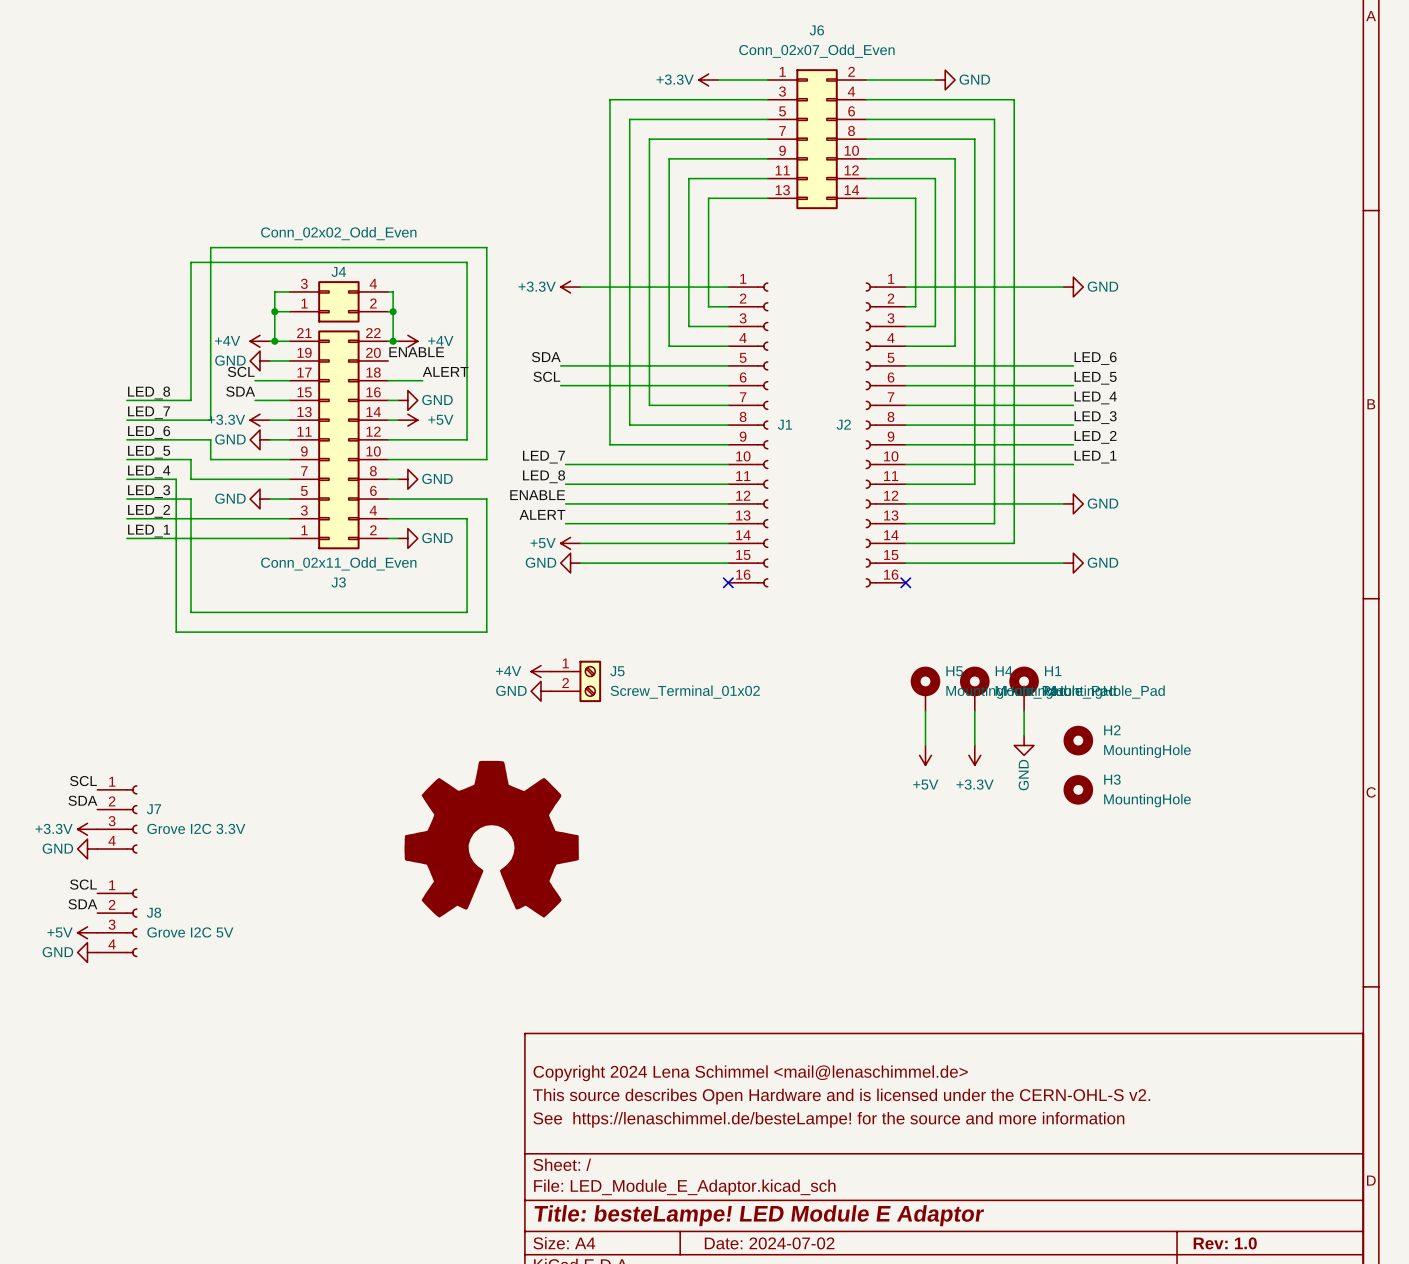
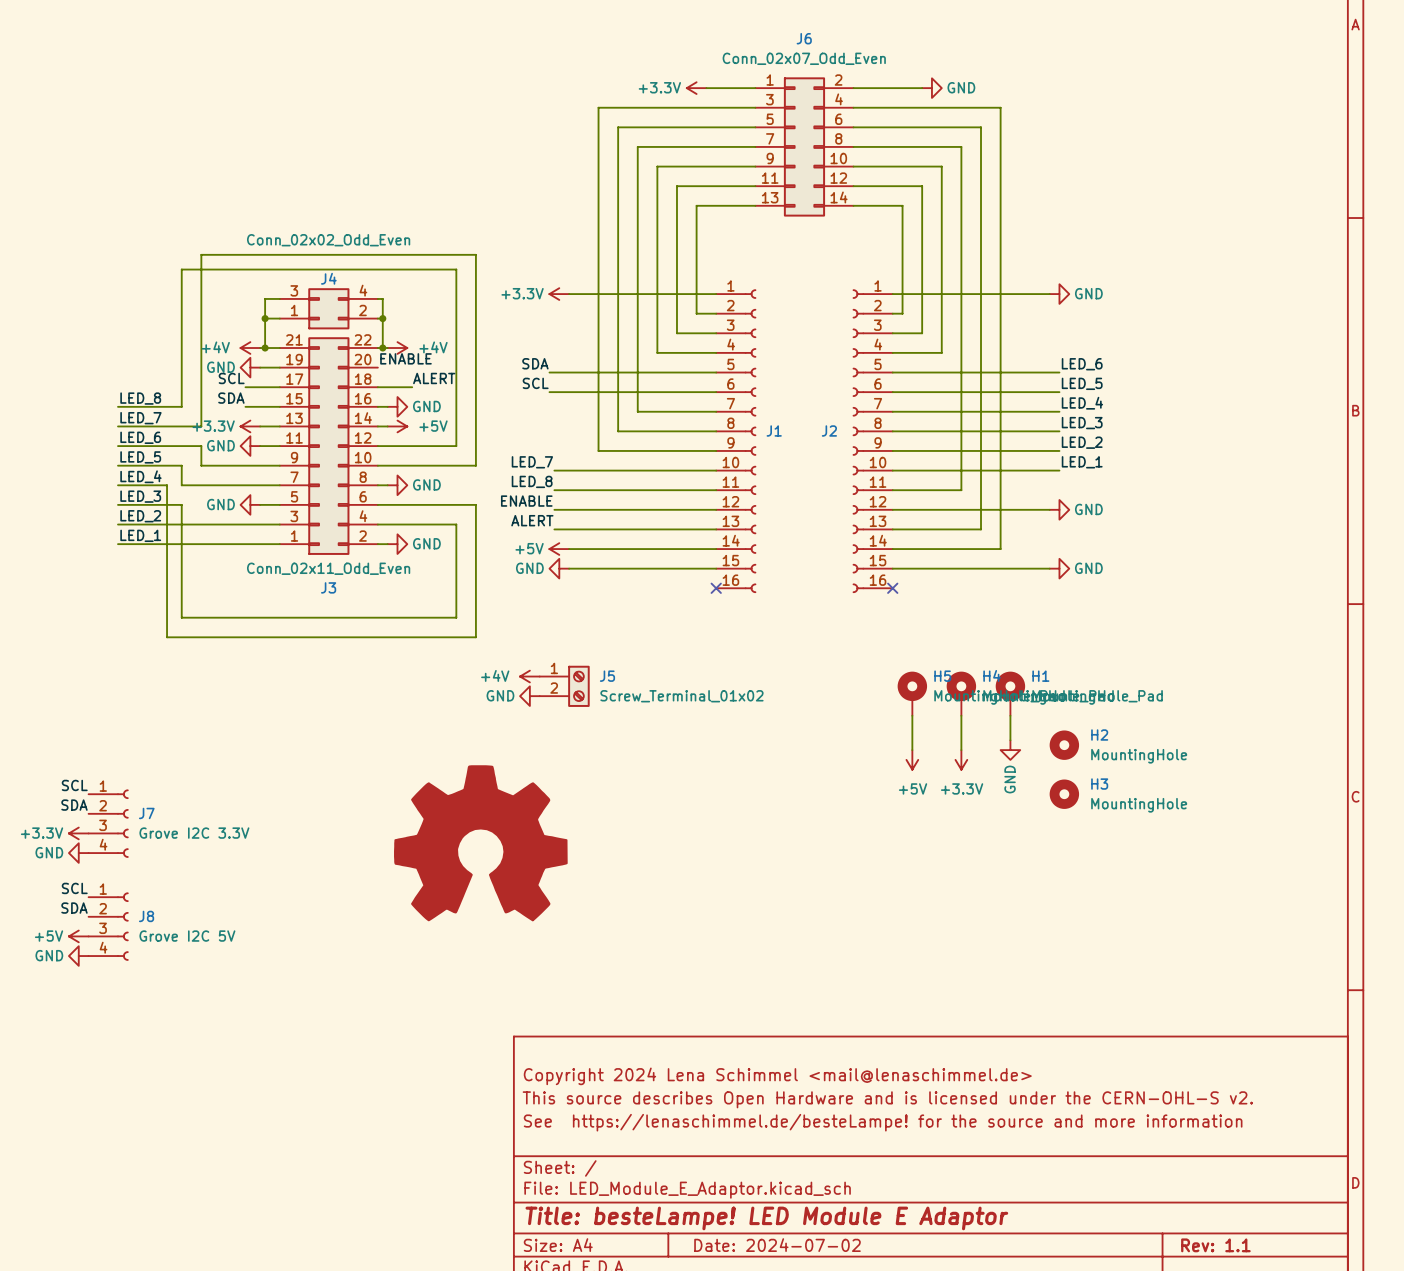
title block: Rev: 1.0 (1225, 1243) -> Rev: 1.1 (1215, 1245)

